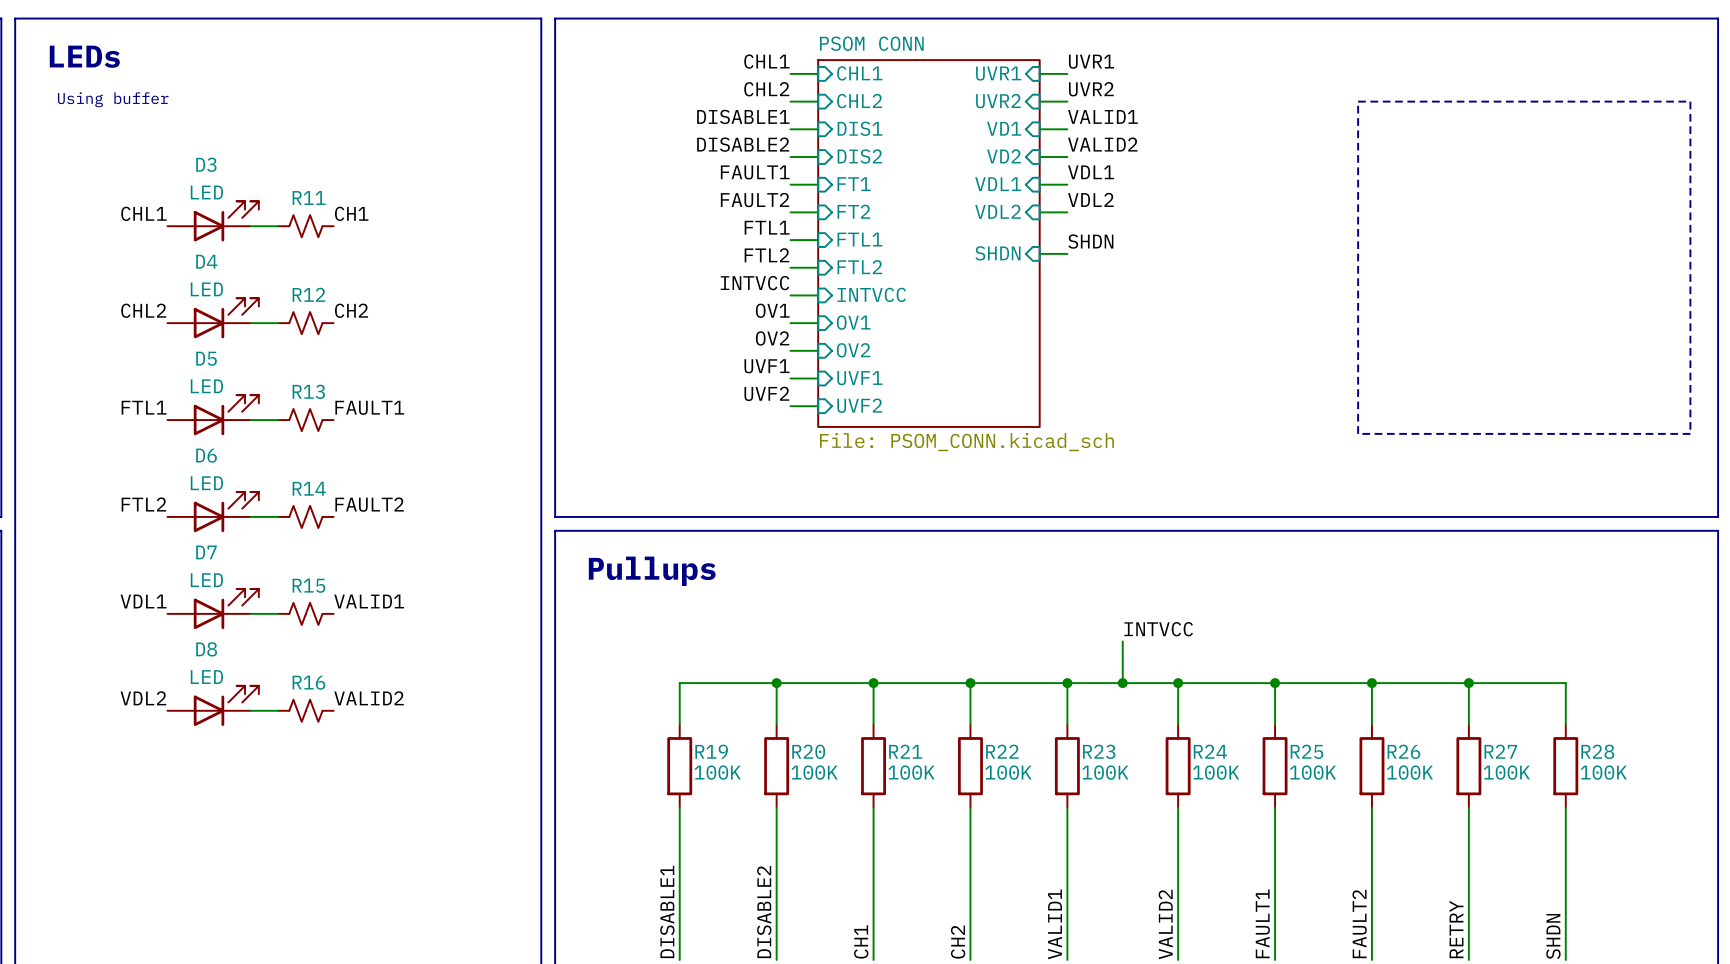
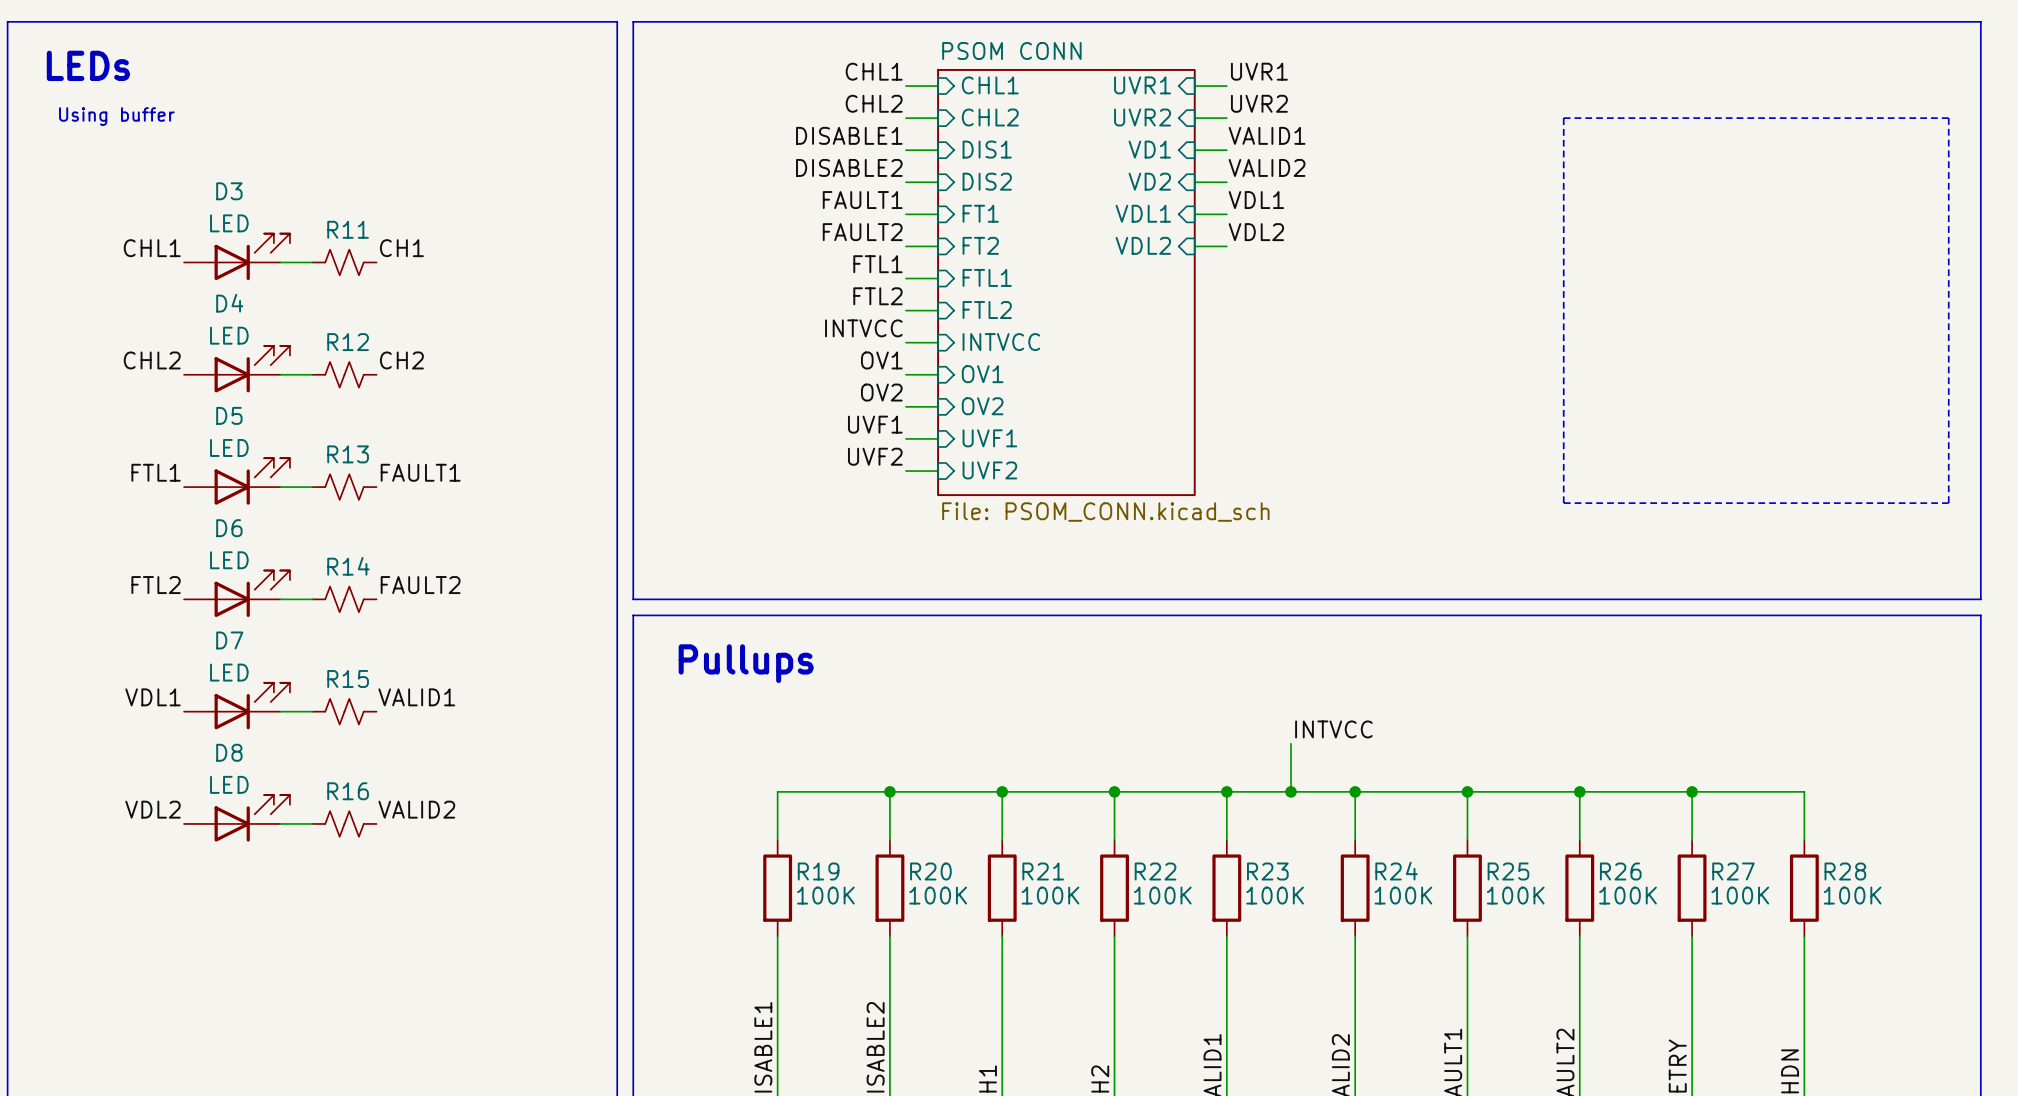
label: SHDN (1090, 241) -> none
sheet pin: SHDN (997, 253) -> none
wire: (1039, 253) (1067, 253) -> none

